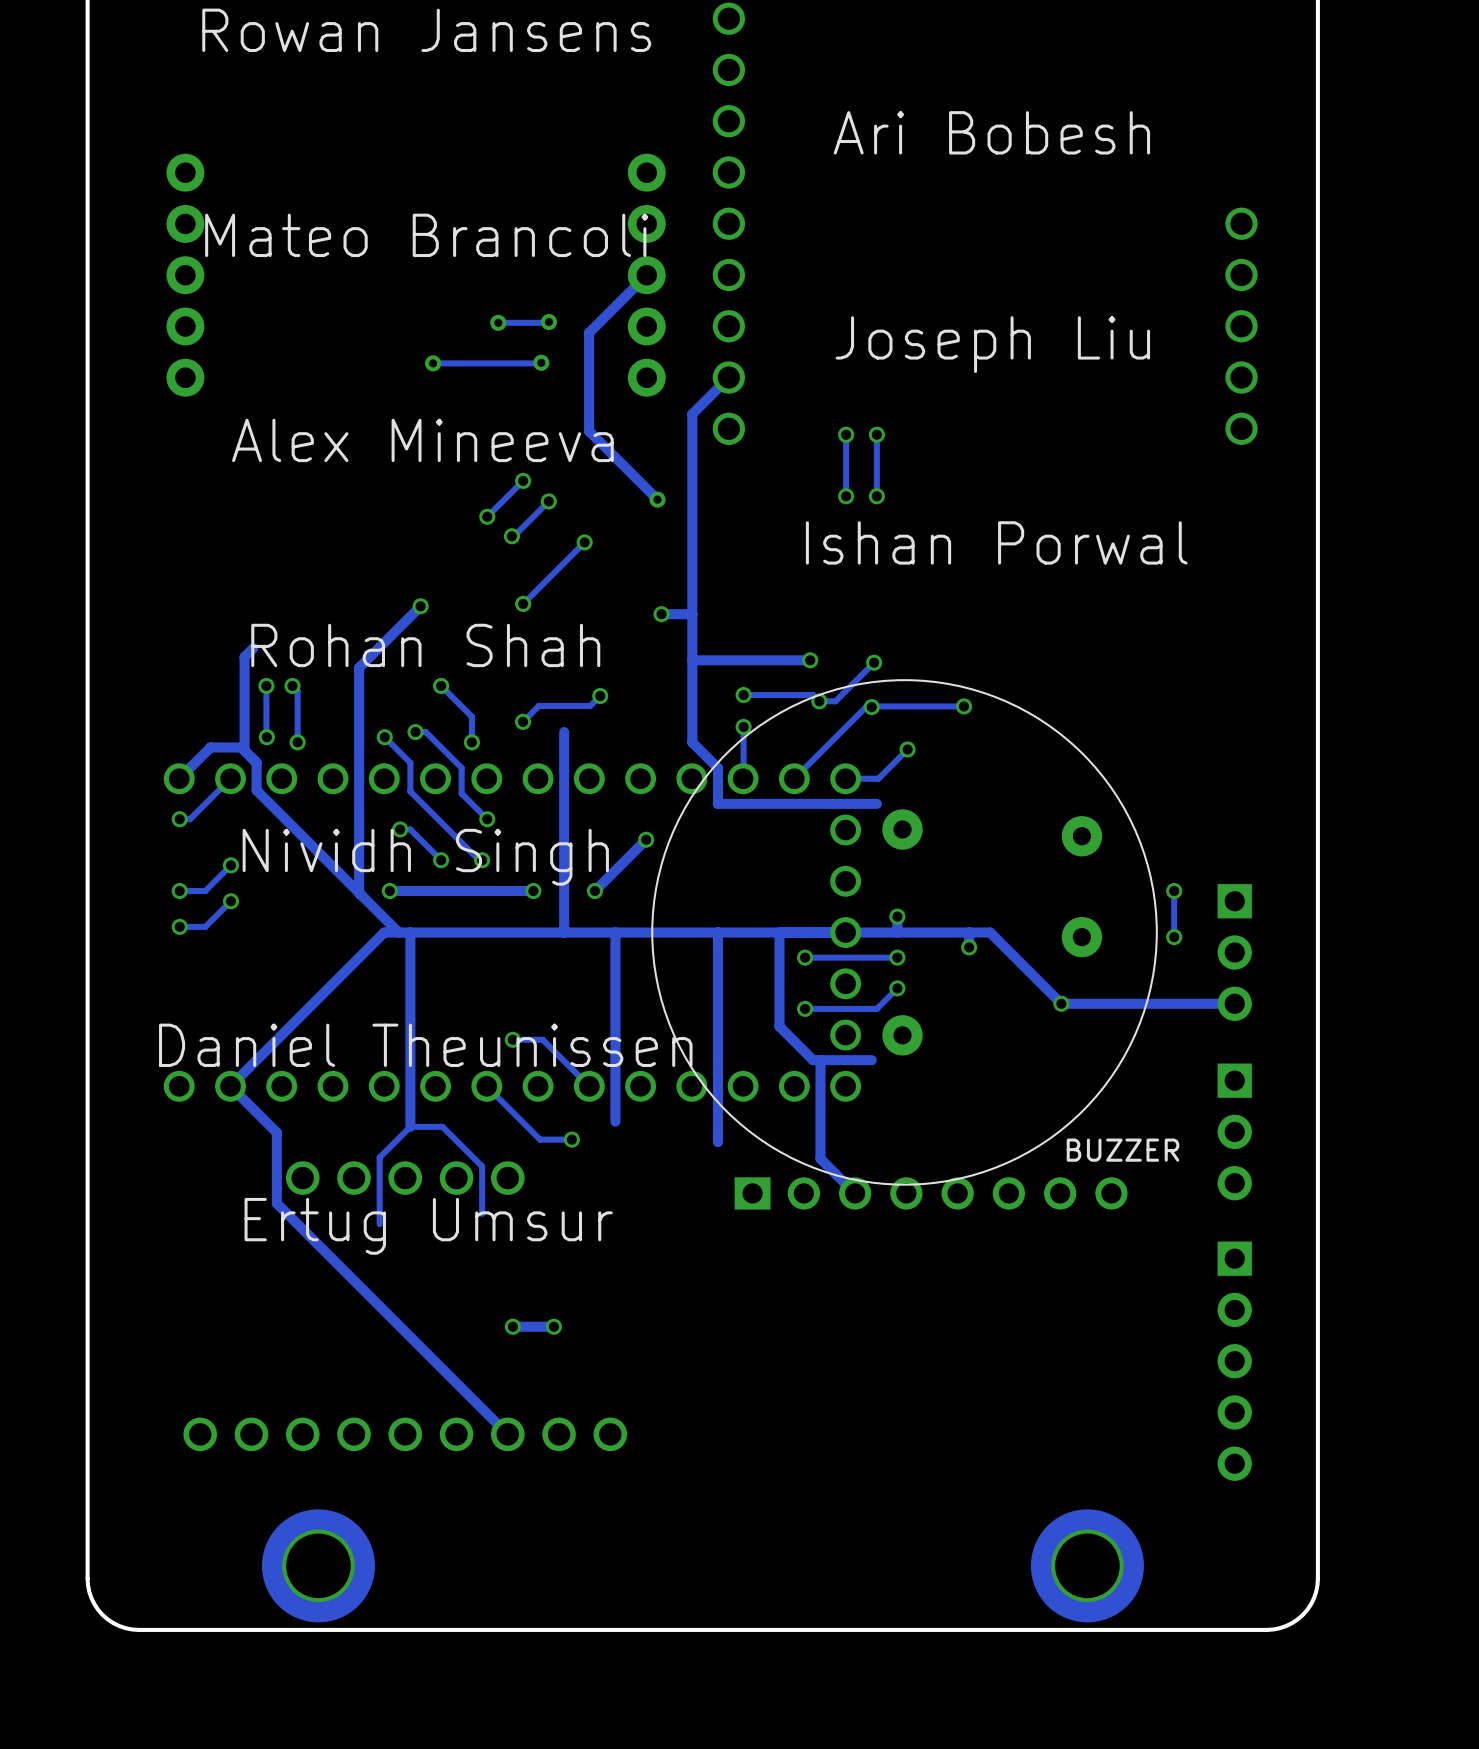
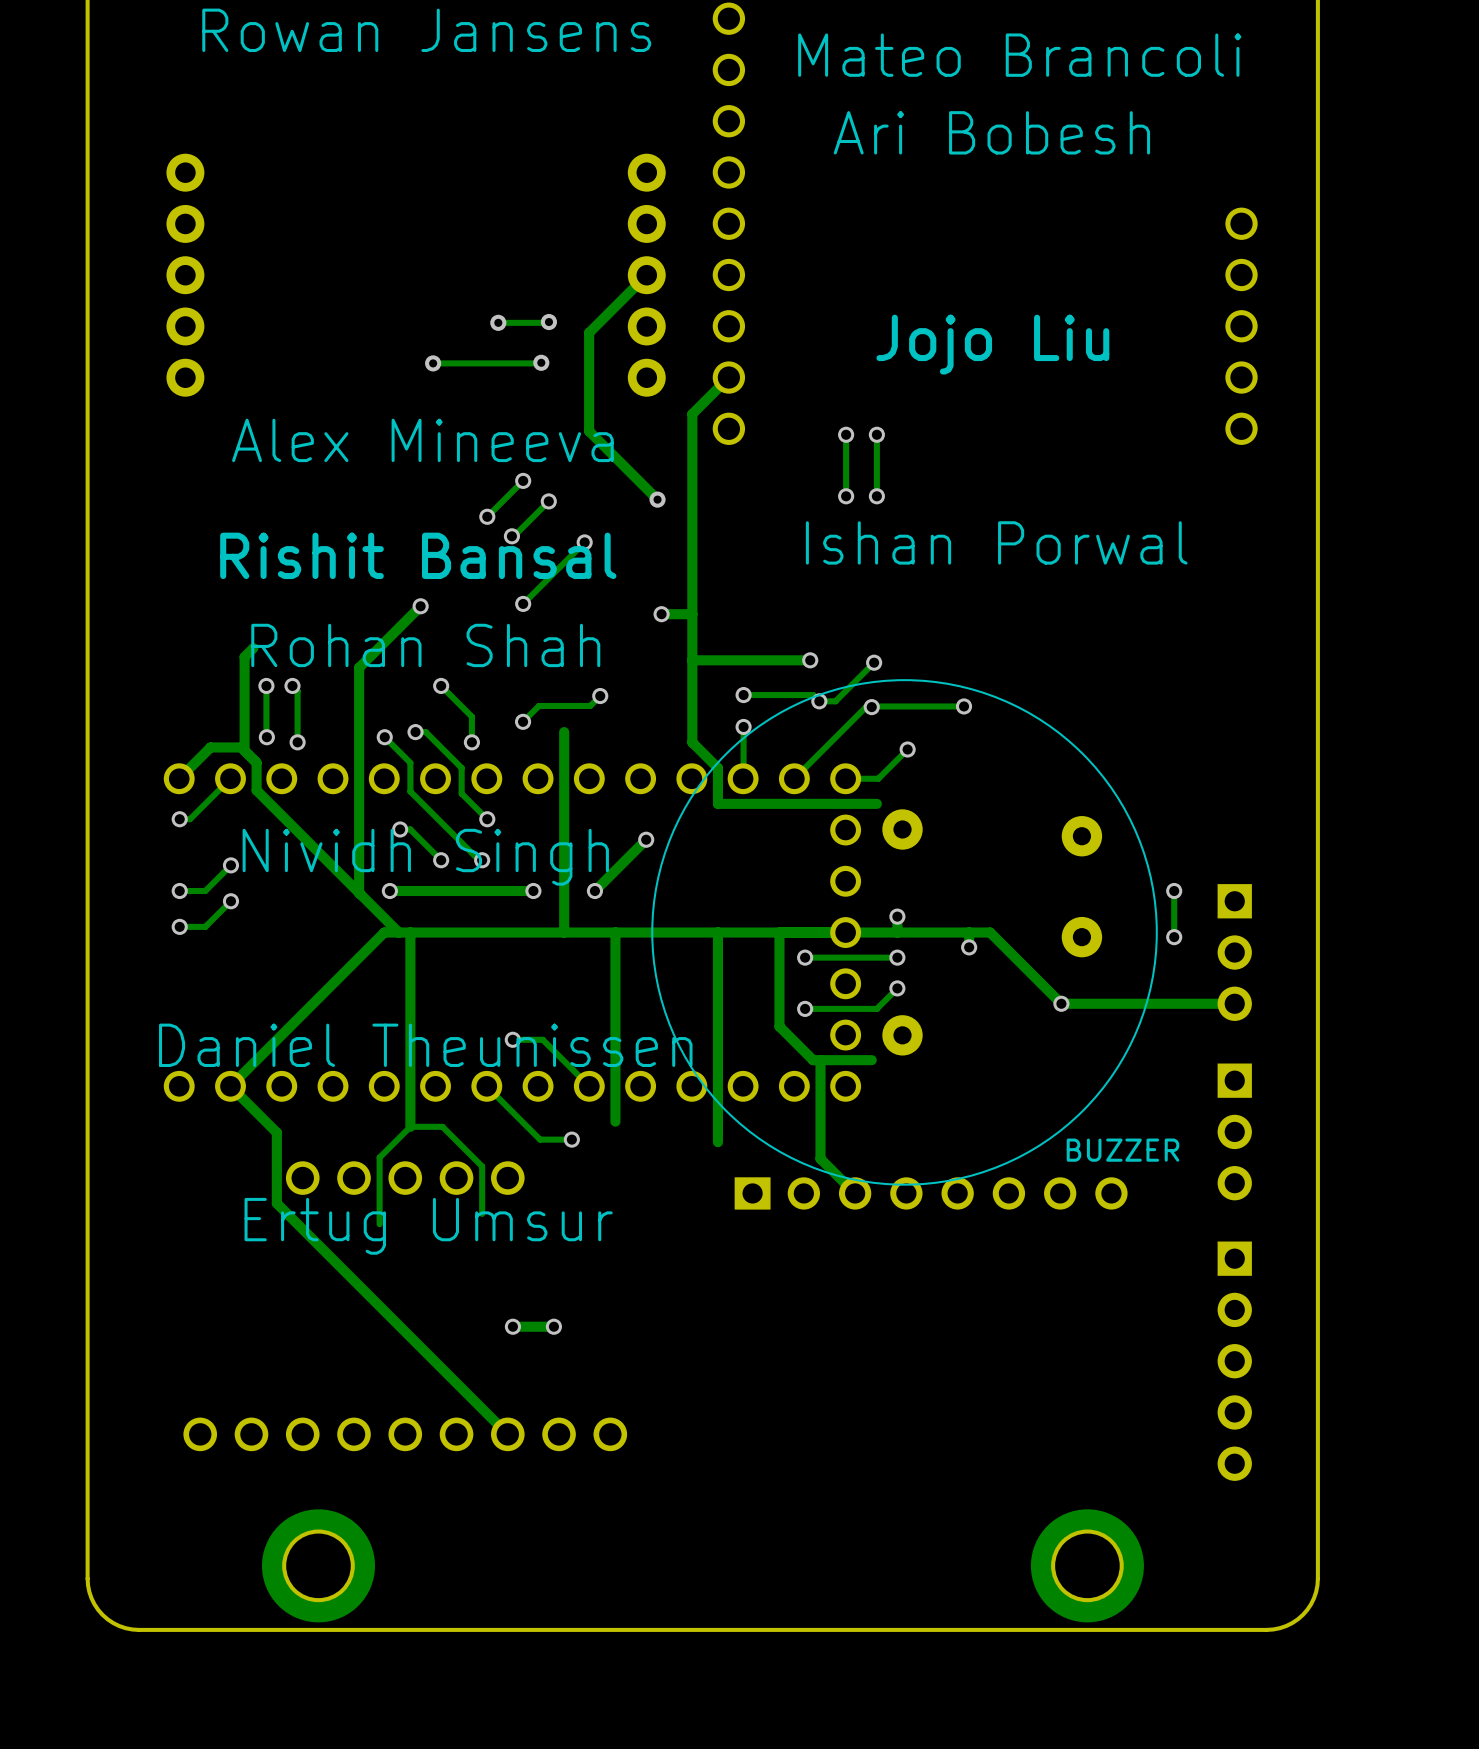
text: none -> Mateo Brancoli (1019, 55)
text: Mateo Brancoli (426, 235) -> none
text: Joseph Liu (992, 344) -> Jojo Liu (992, 344)
text: none -> Rishit Bansal (418, 555)

